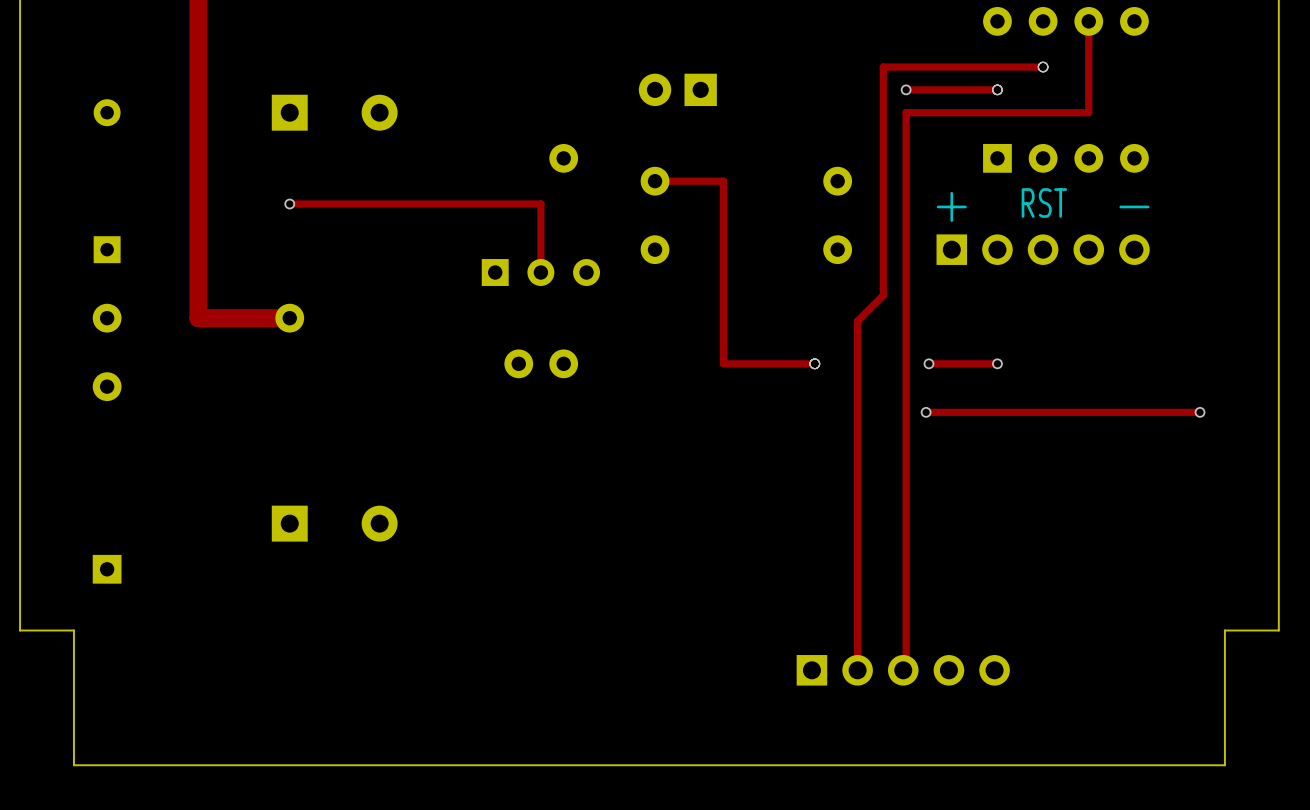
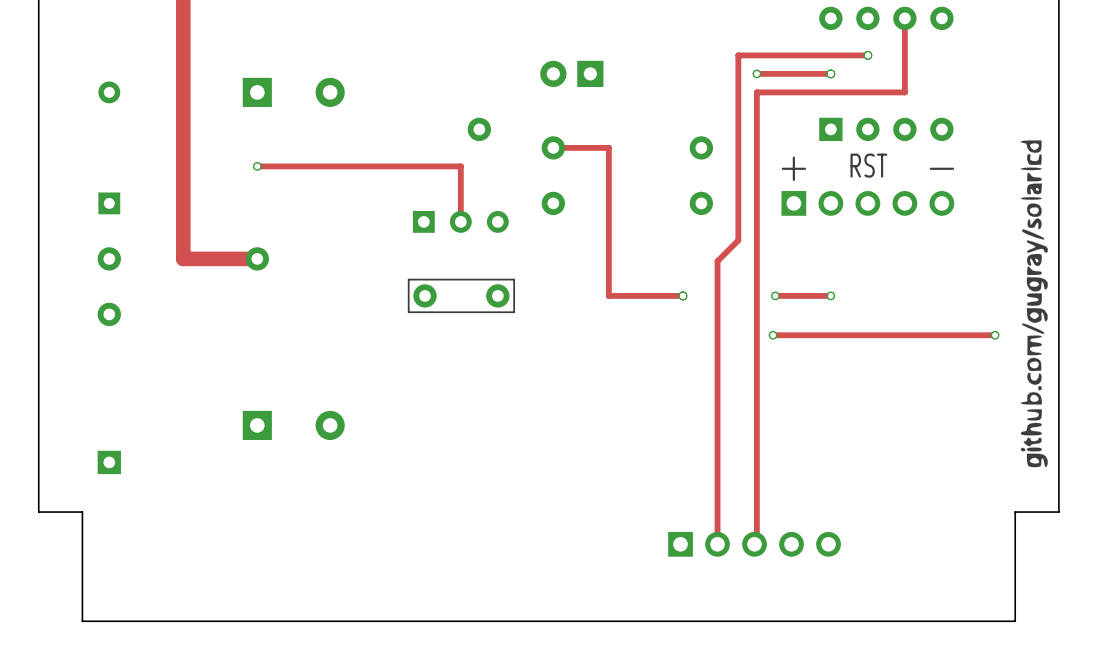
drawing: none -> [1020, 140, 1048, 468]
part footprint: [504, 349, 579, 379] -> [407, 278, 516, 314]

